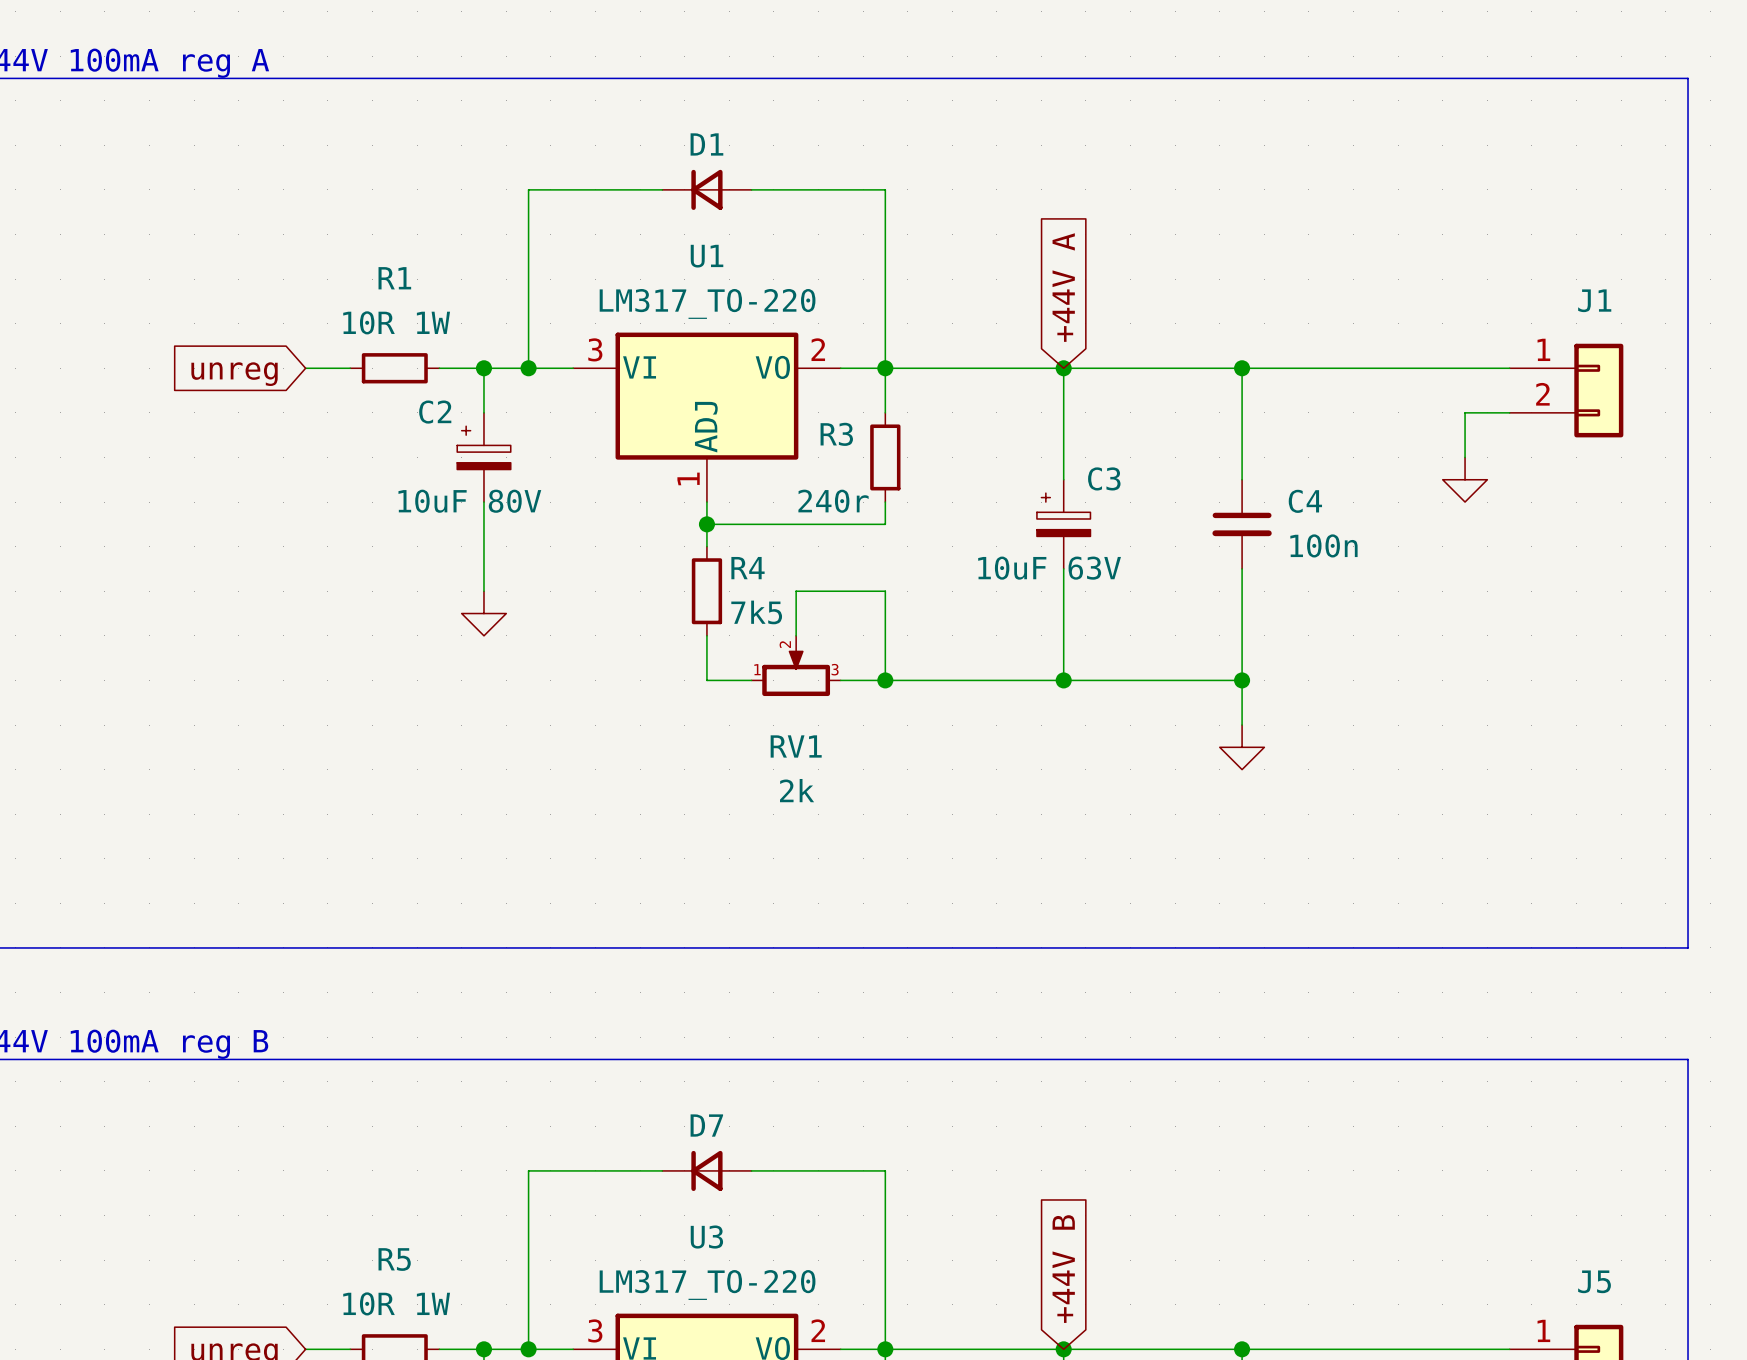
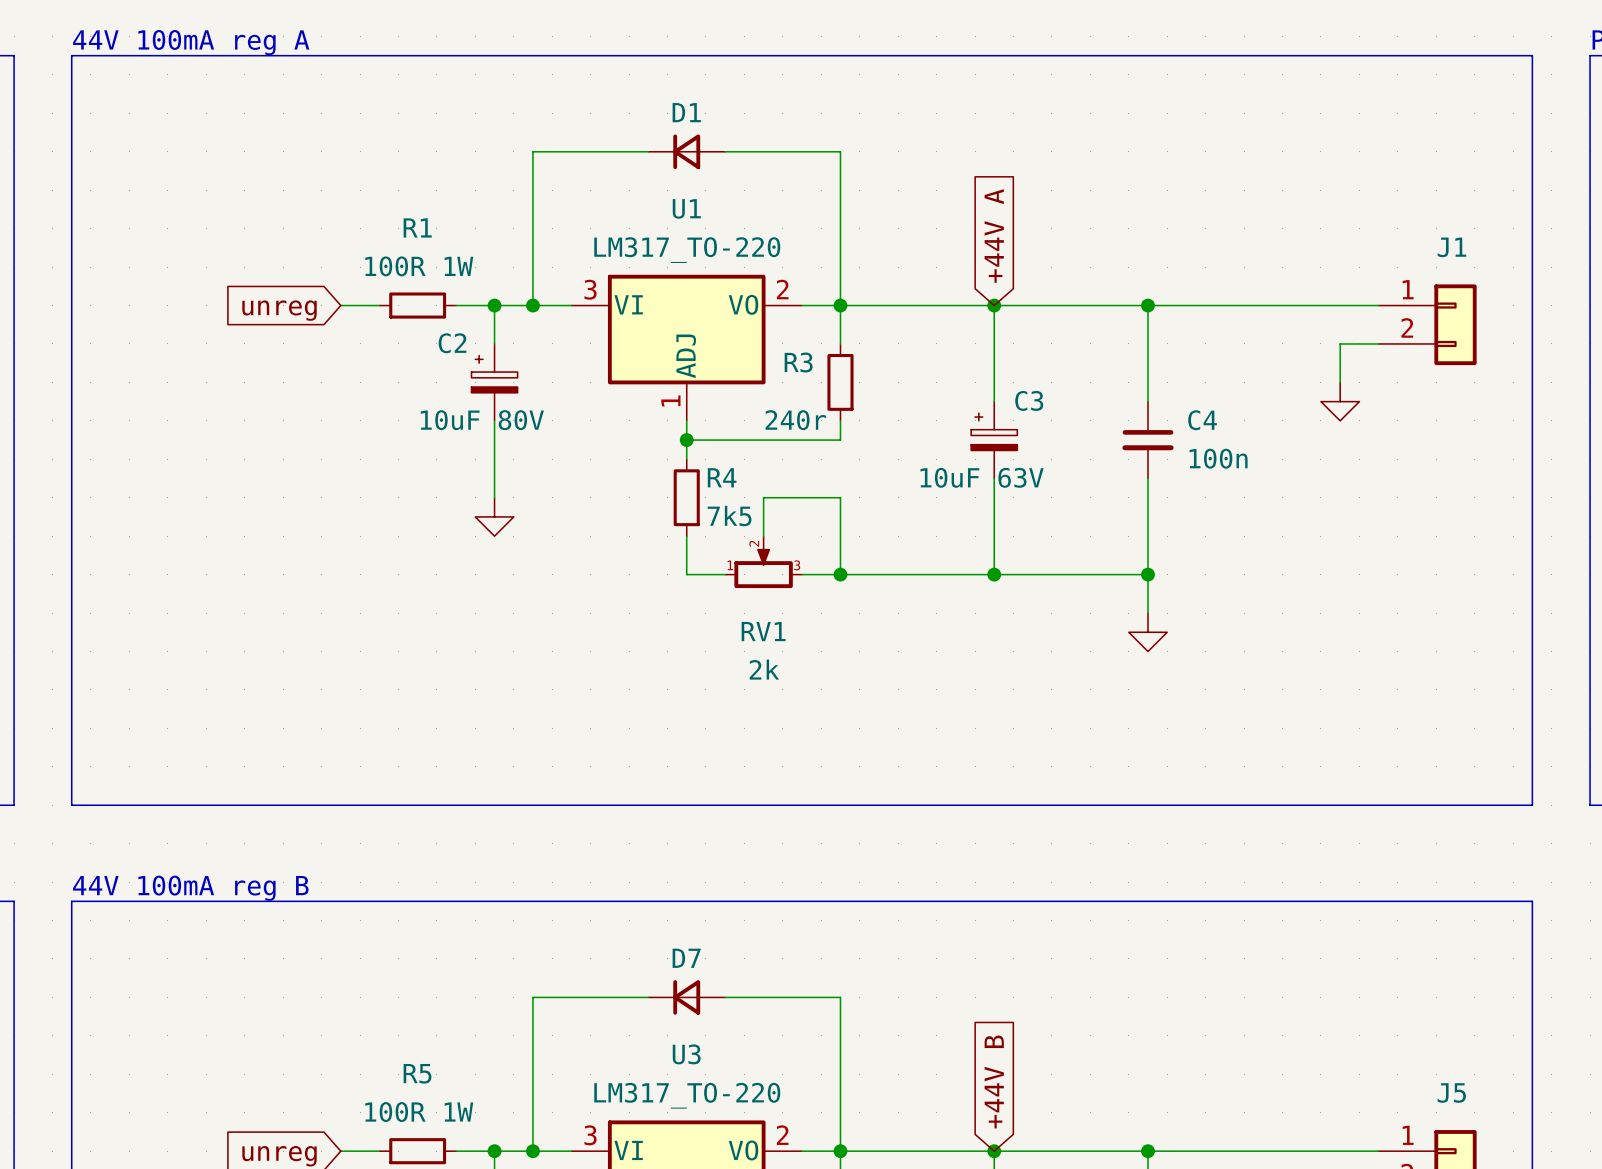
R1 value: 10R 1W (396, 322) -> 100R 1W (419, 266)
R5 value: 10R 1W (396, 1303) -> 100R 1W (419, 1112)

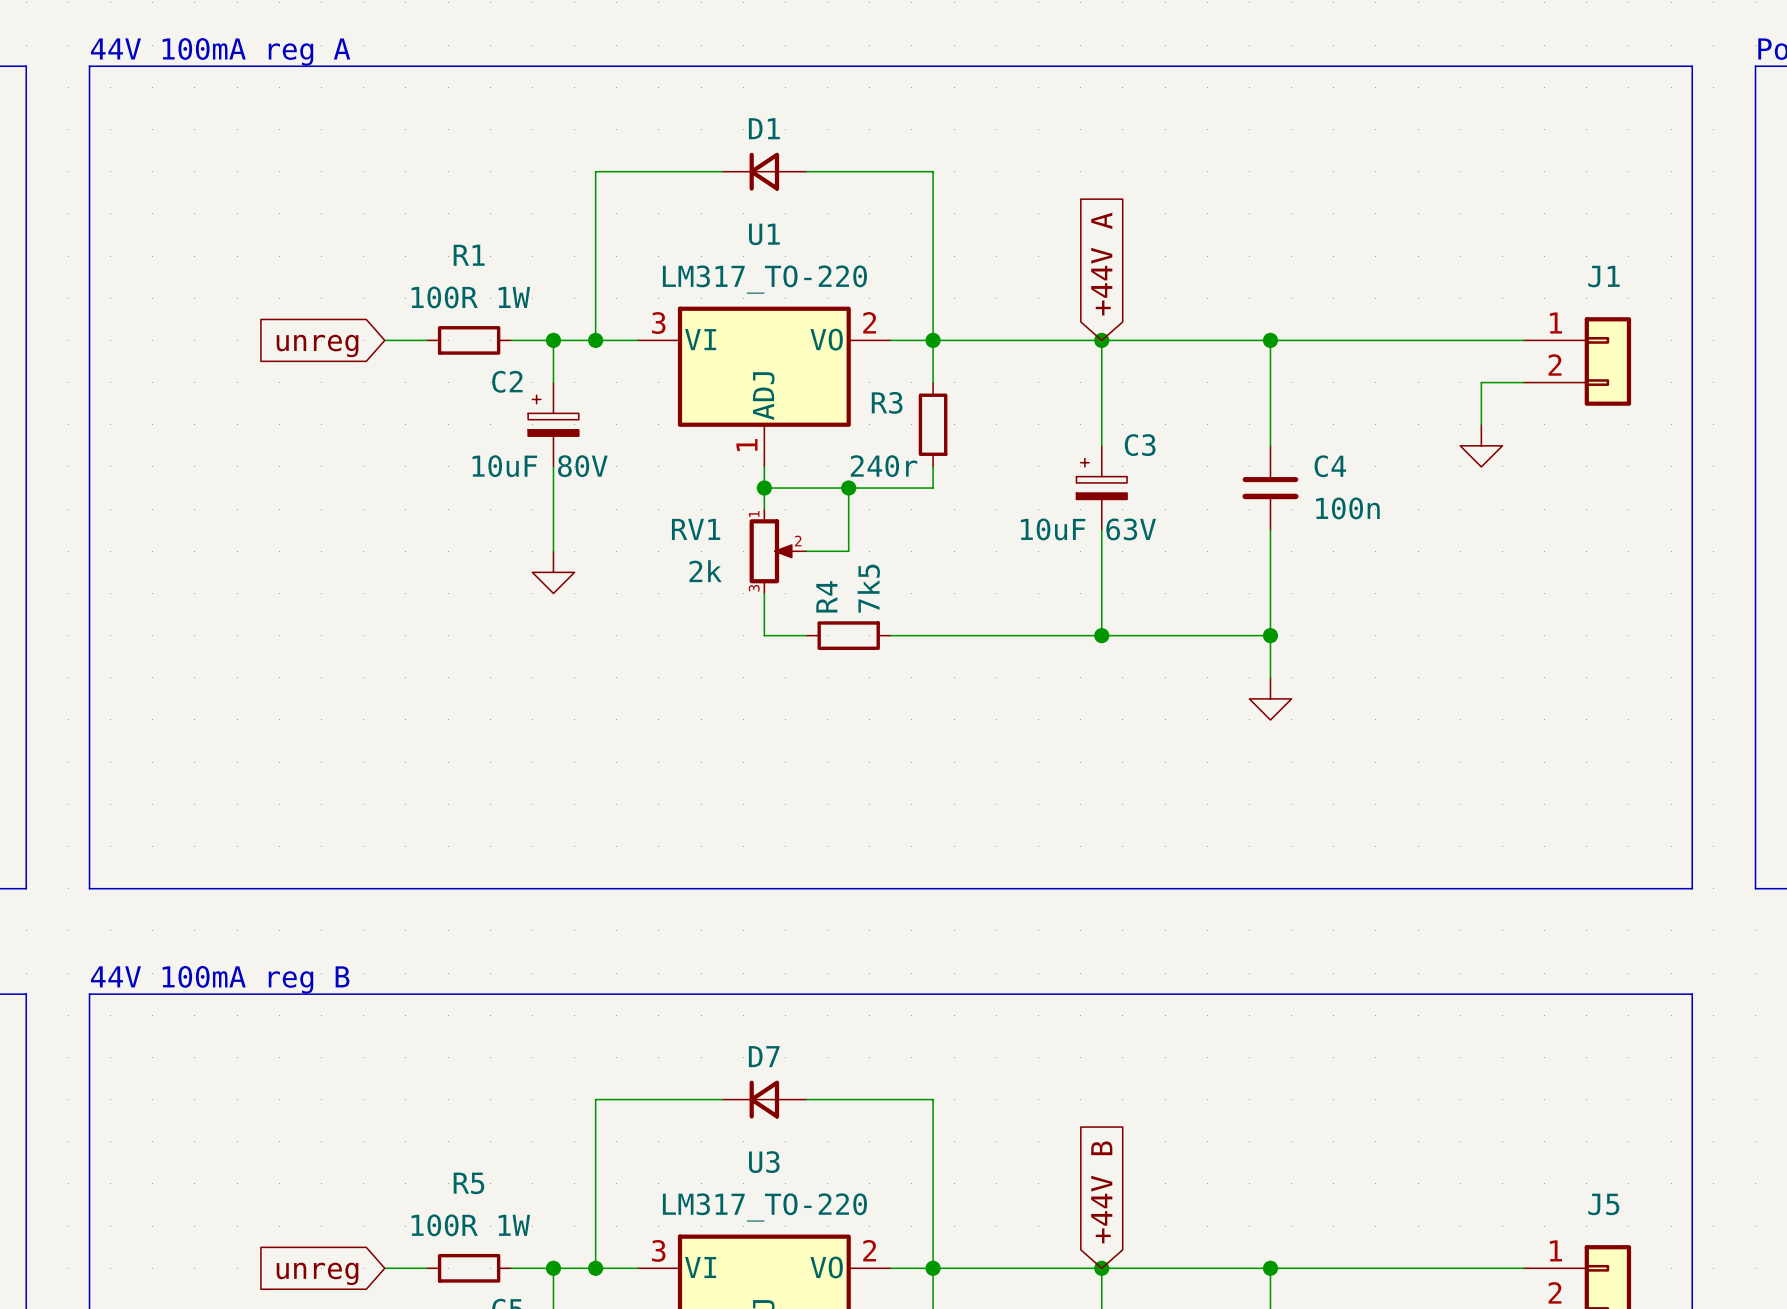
wire: none -> (848, 488) (848, 551) (806, 551)
junction: none -> (848, 488)
R4 name position: R4 (722, 477) -> R4 (826, 596)
R4 rotation: 0° (686, 497) -> 90° clockwise (848, 635)
R4 position: (686, 497) -> (848, 635)
R4 value position: 7k5 (729, 516) -> 7k5 (868, 588)
wire: (763, 536) (763, 497) (840, 497) (840, 574) -> none
RV1 position: (763, 562) -> (778, 551)
RV1 rotation: 0° (763, 568) -> 90° clockwise (770, 551)
junction: (840, 574) -> none
RV1 value position: 2k (764, 669) -> 2k (705, 571)

